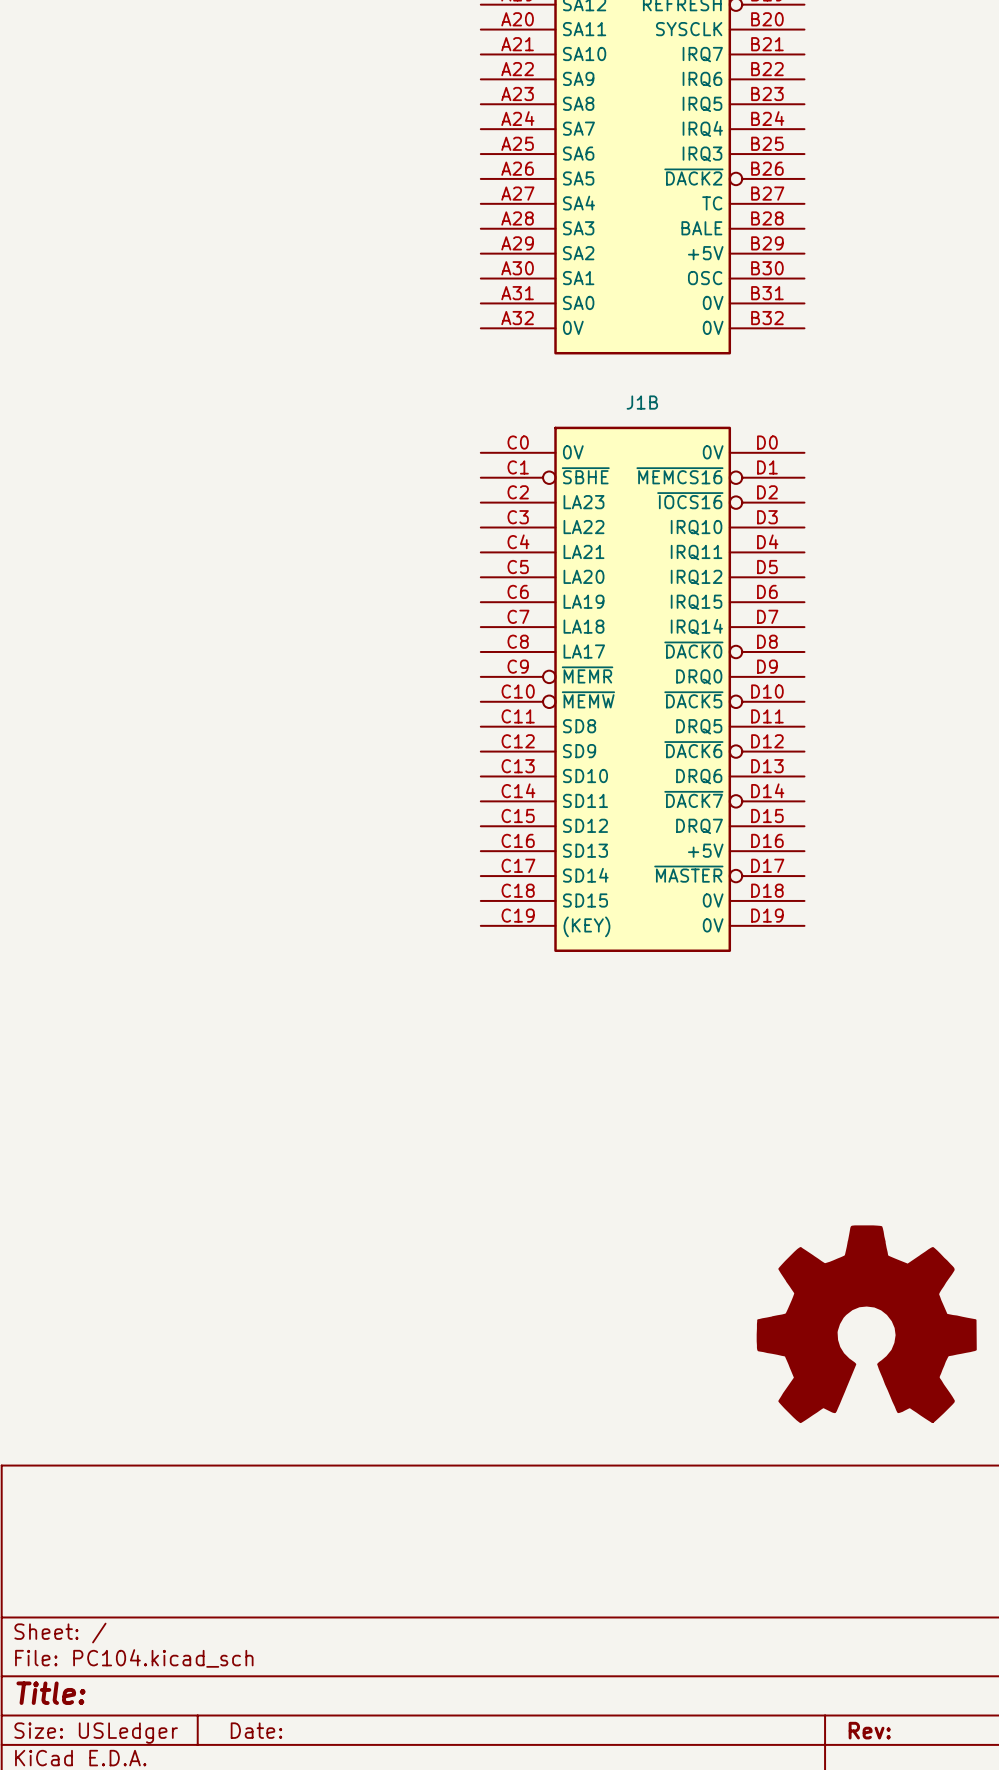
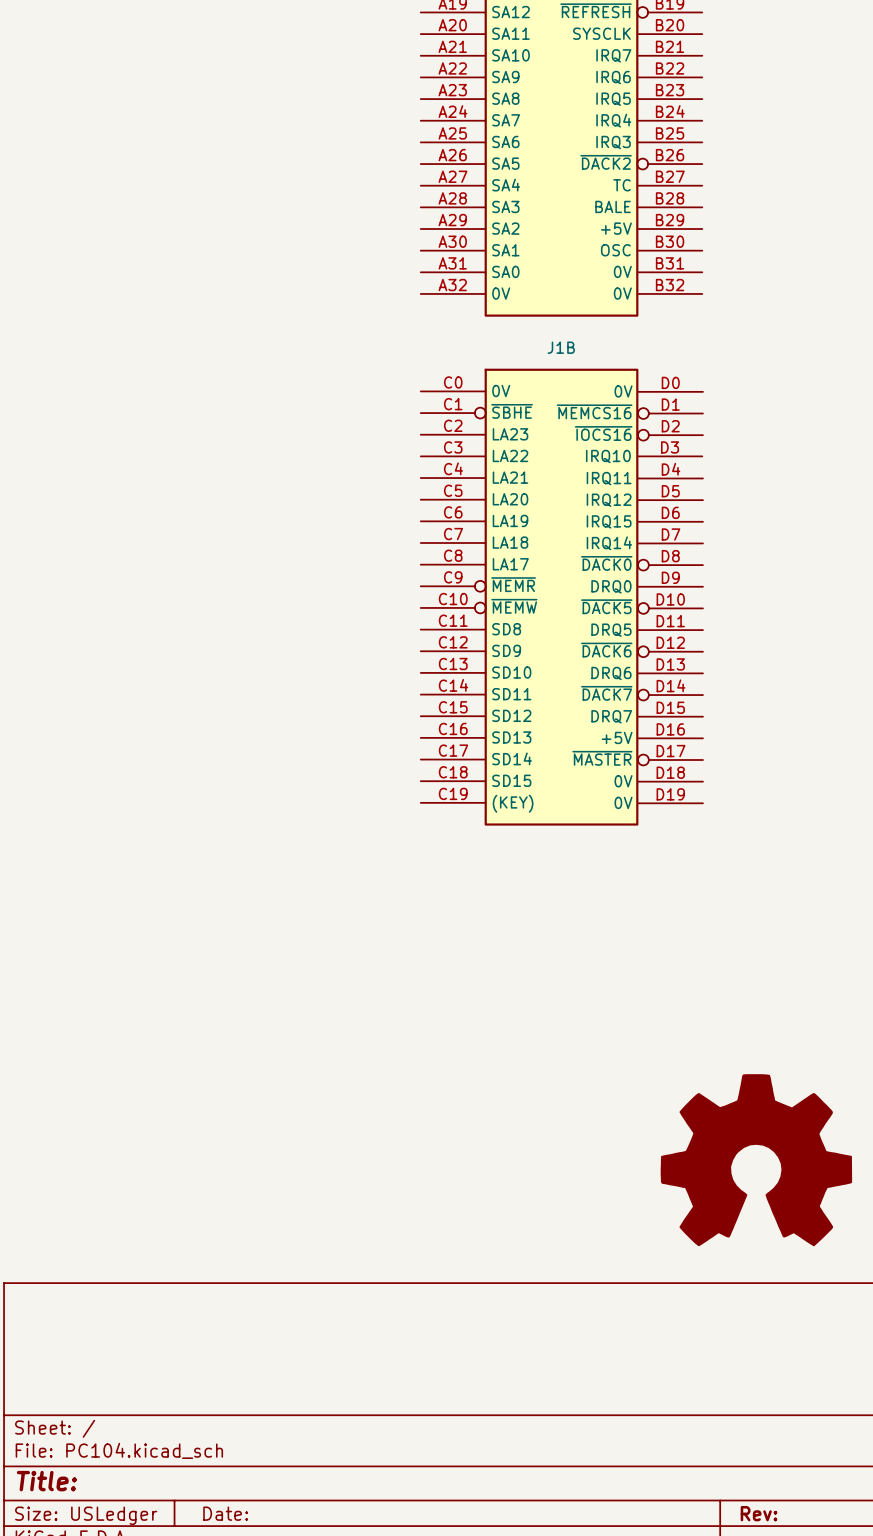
J1B symbol: [480, 426, 805, 953] -> [420, 368, 703, 826]

